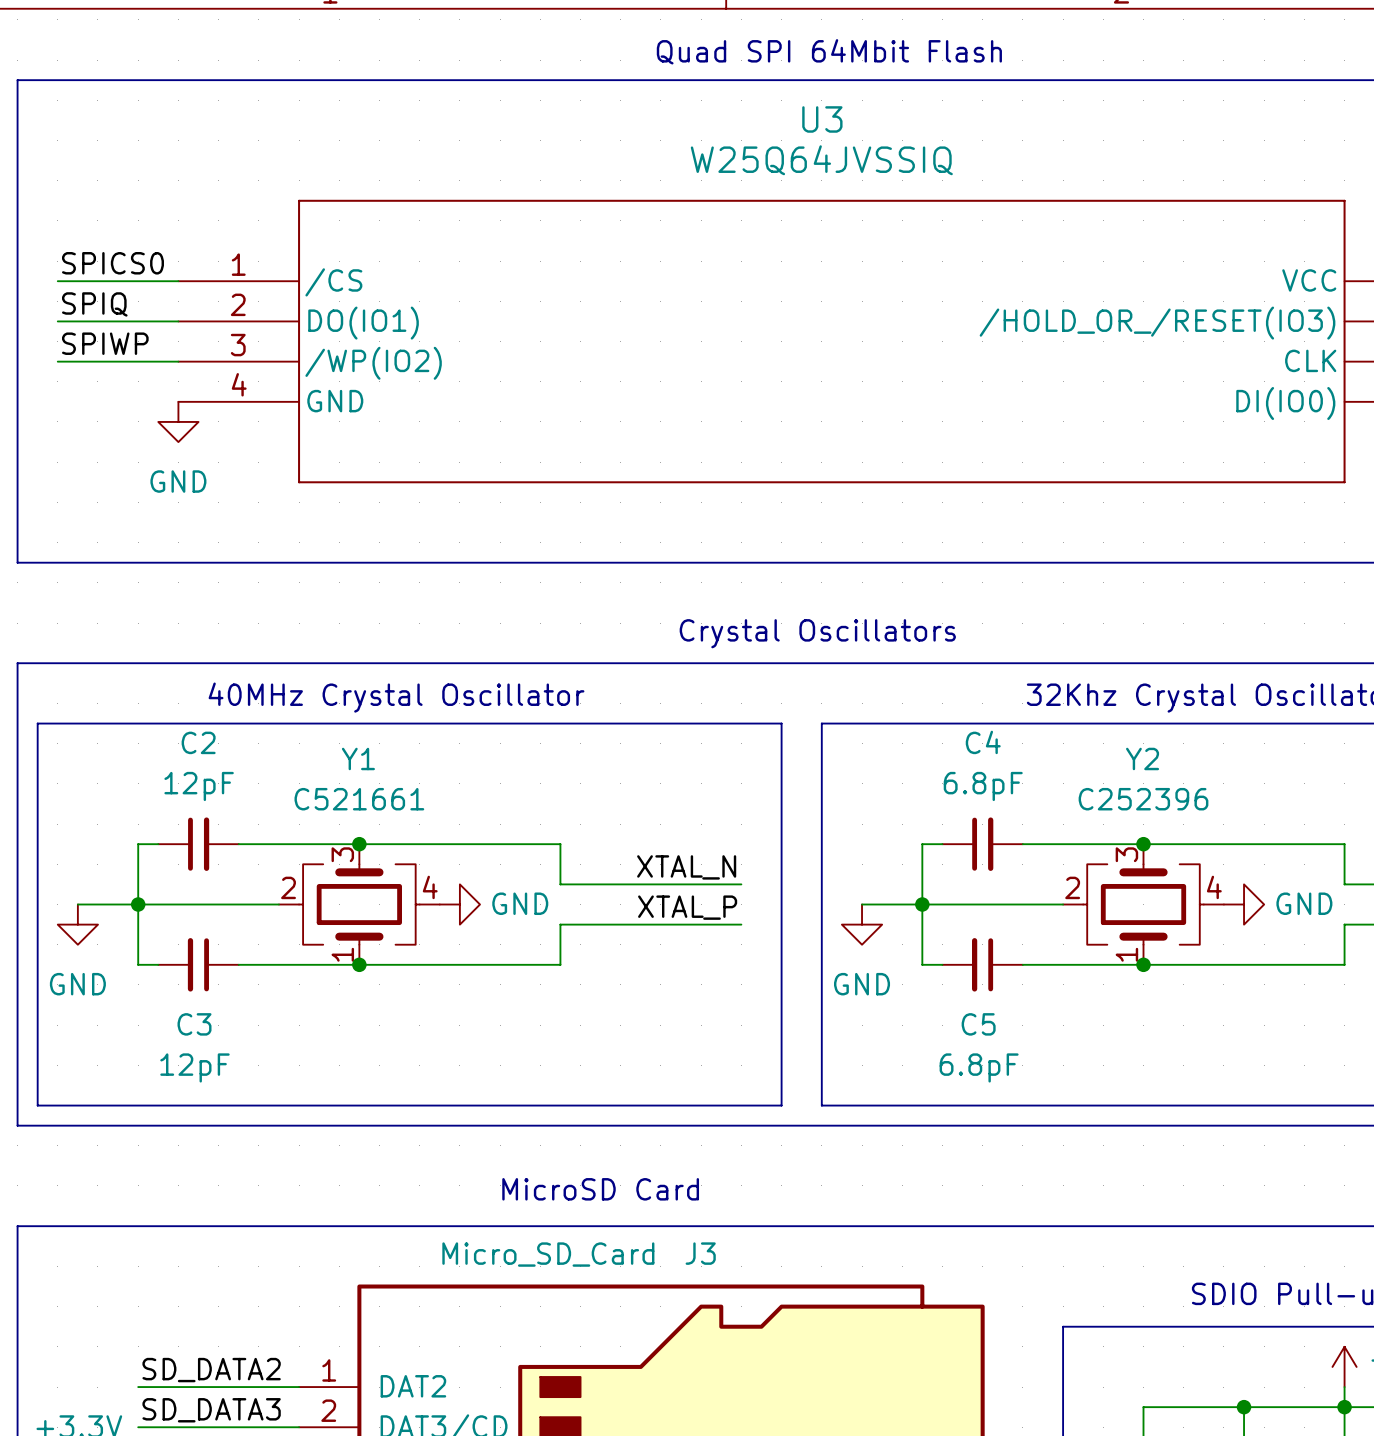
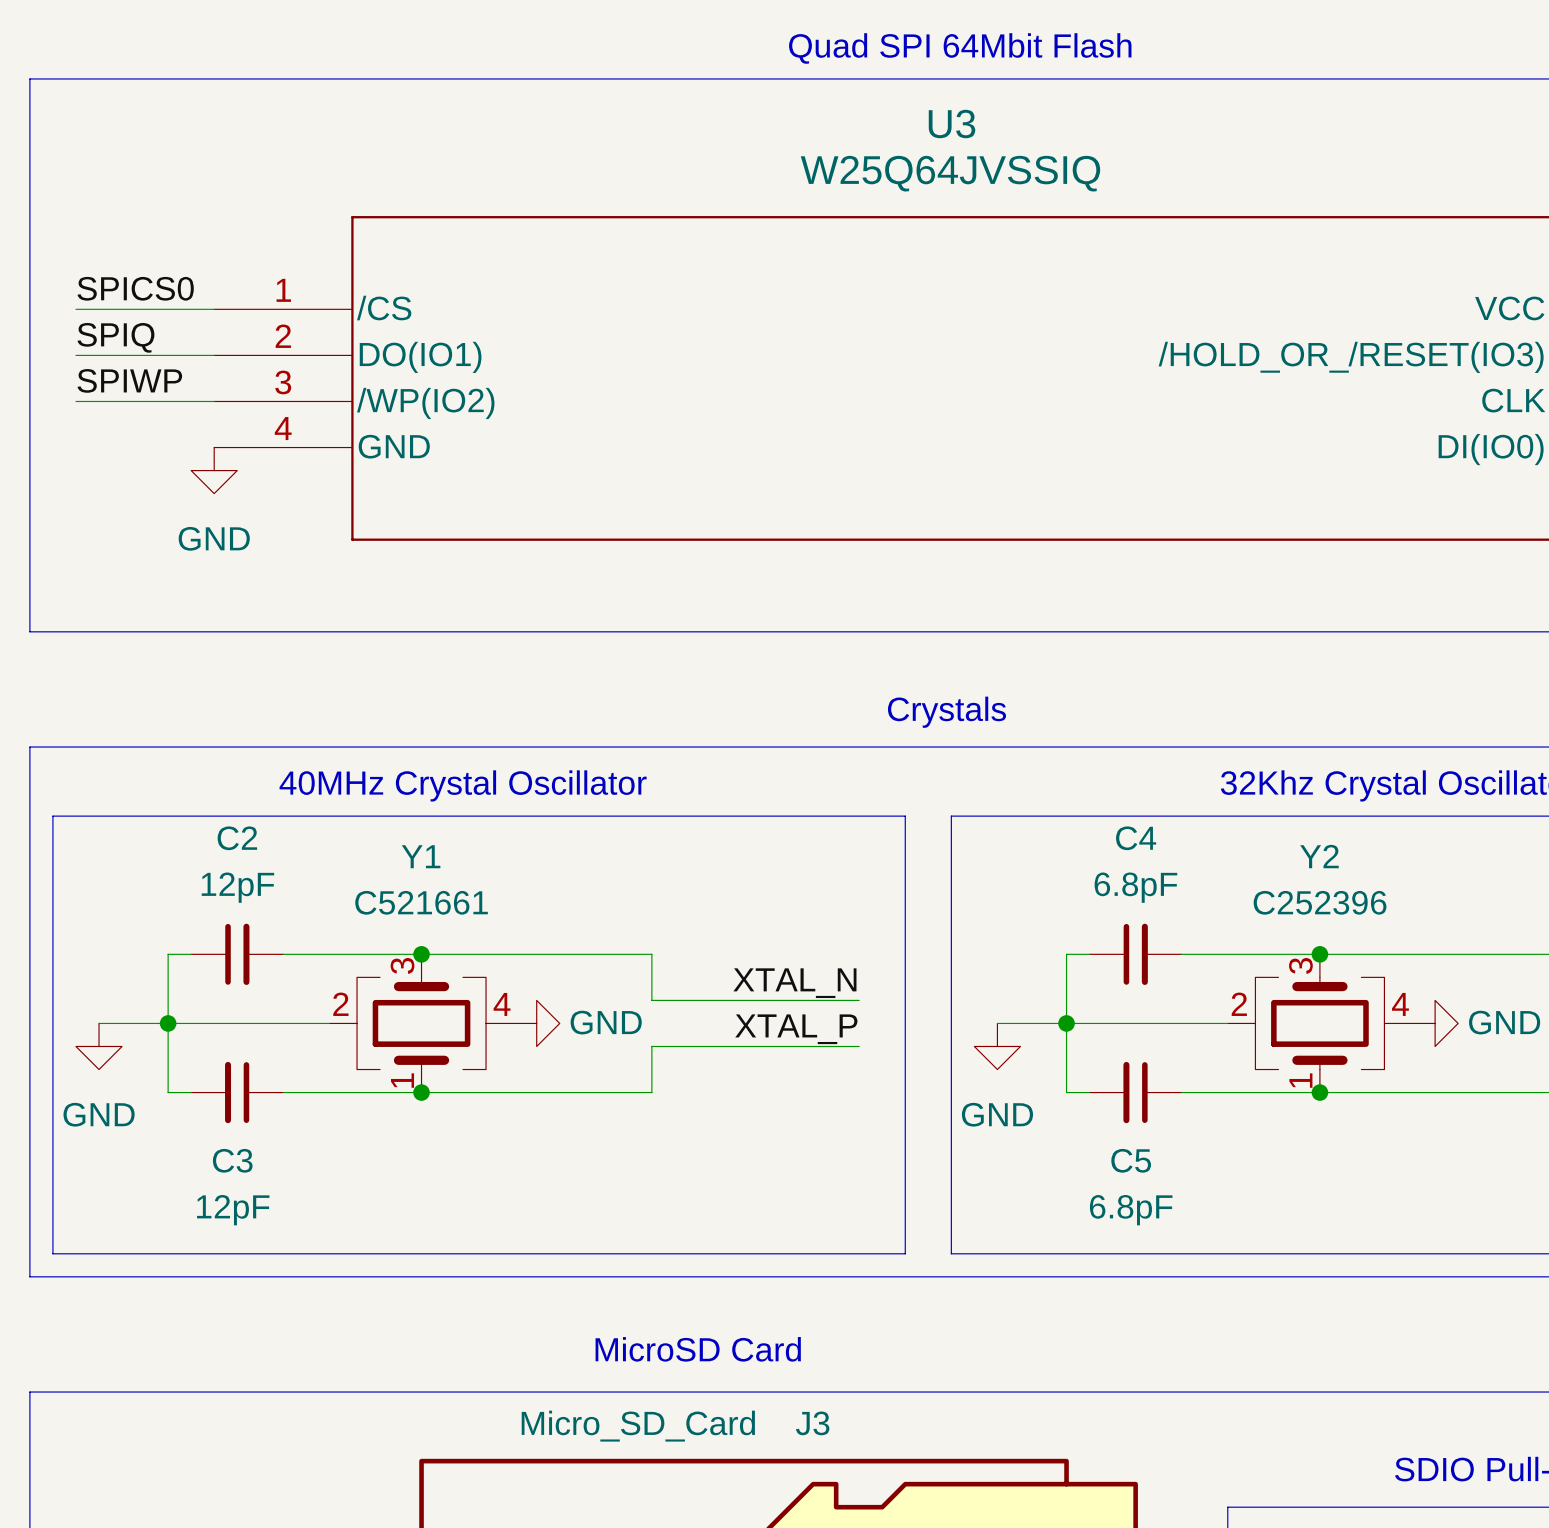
text: Crystal Oscillators (817, 633) -> Crystals (946, 712)

